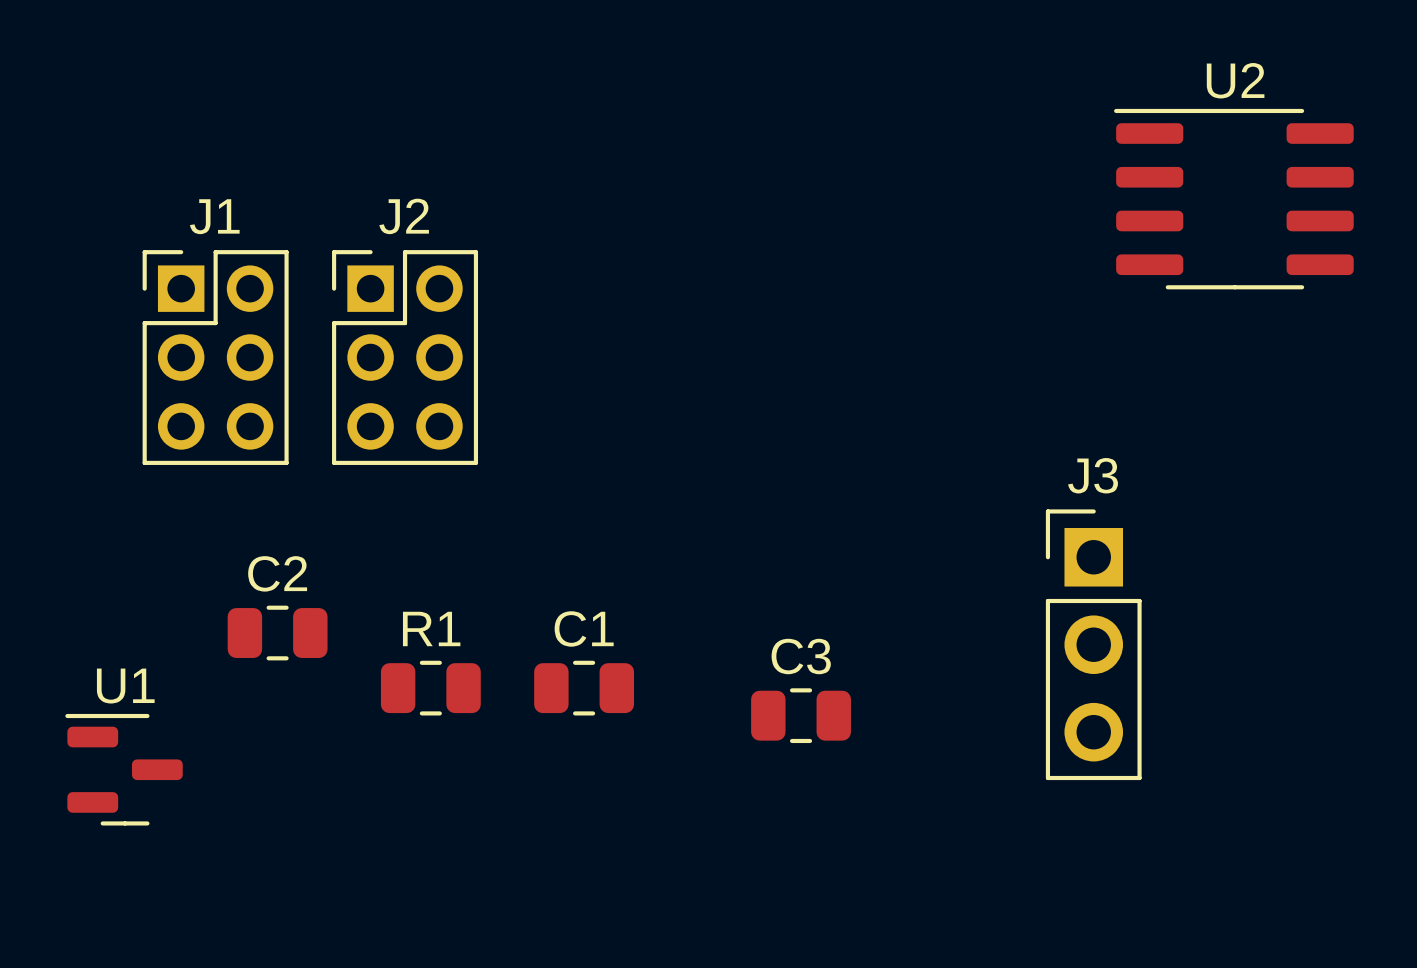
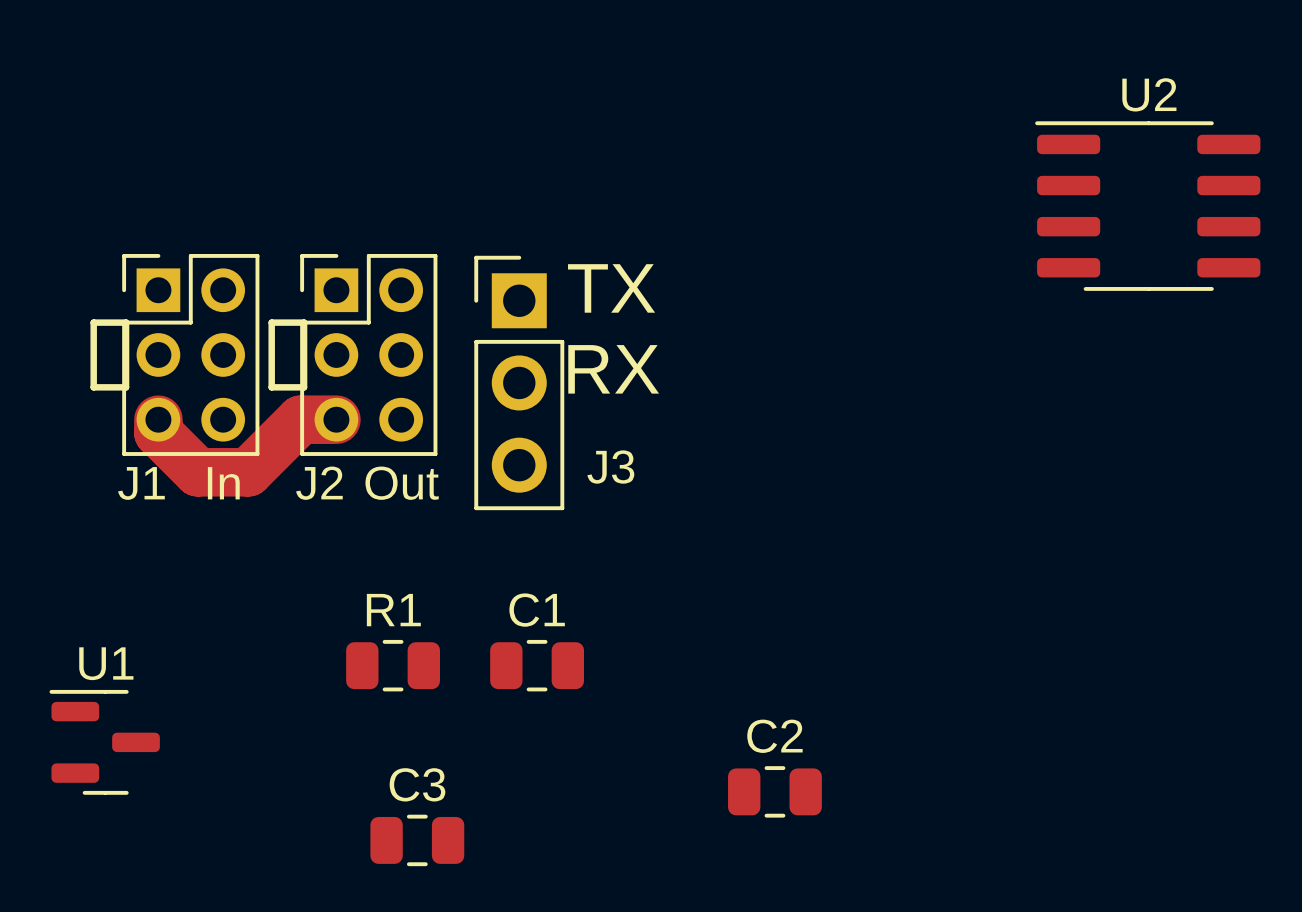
J1 name position: J1 (214, 216) -> J1 (141, 483)
J2 name position: J2 (404, 216) -> J2 (319, 483)
text: none -> TX (611, 288)
line: none -> (93, 322) (126, 322) (126, 387) (93, 387) (93, 322)
line: none -> (271, 322) (304, 322) (304, 387) (271, 387) (271, 322)
text: none -> RX (613, 369)
track: none -> (158, 419) (158, 432) (197, 472) (248, 472) (300, 419) (336, 419)
J3 name position: J3 (1093, 475) -> J3 (610, 467)
J1 value: none -> In (223, 483)
J2 value: none -> Out (402, 483)
C2 position: (277, 633) -> (774, 791)
J3 position: (1093, 644) -> (519, 382)
C3 position: (801, 715) -> (417, 840)

